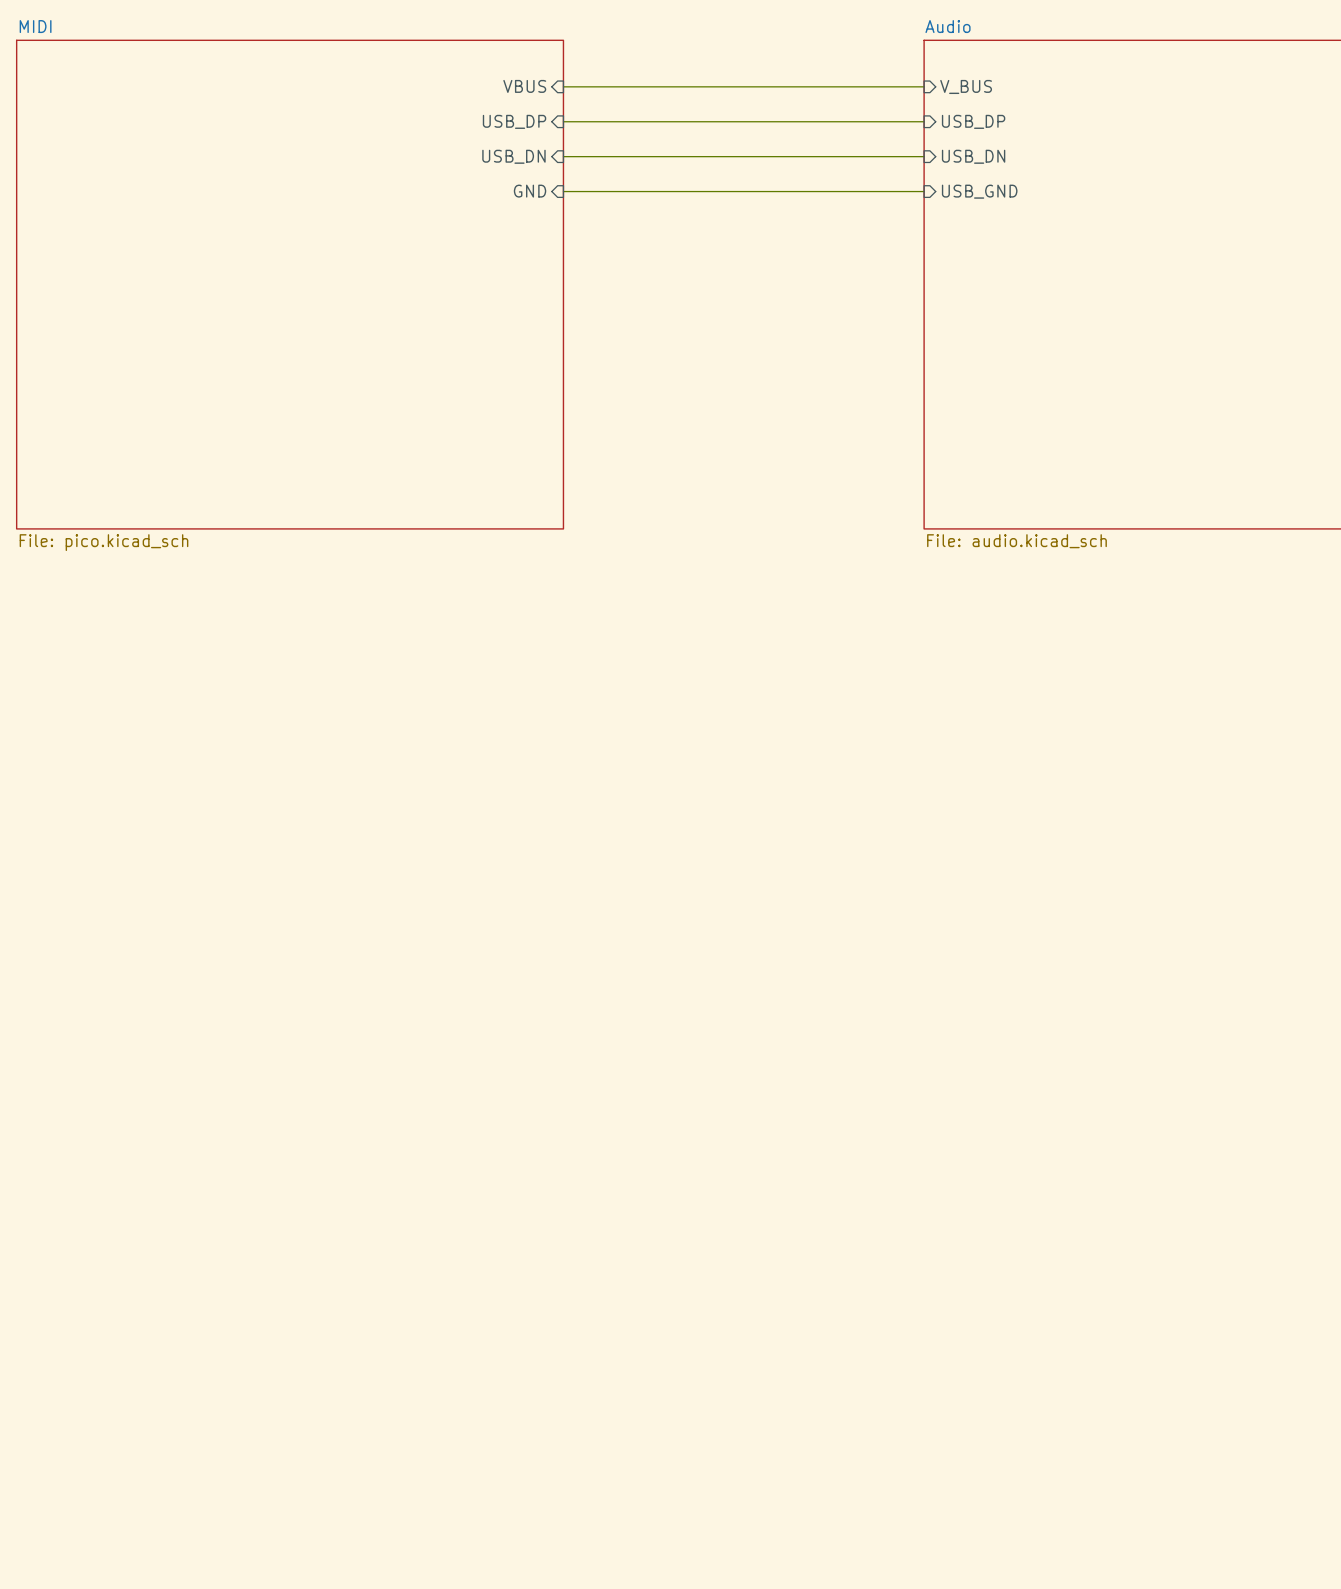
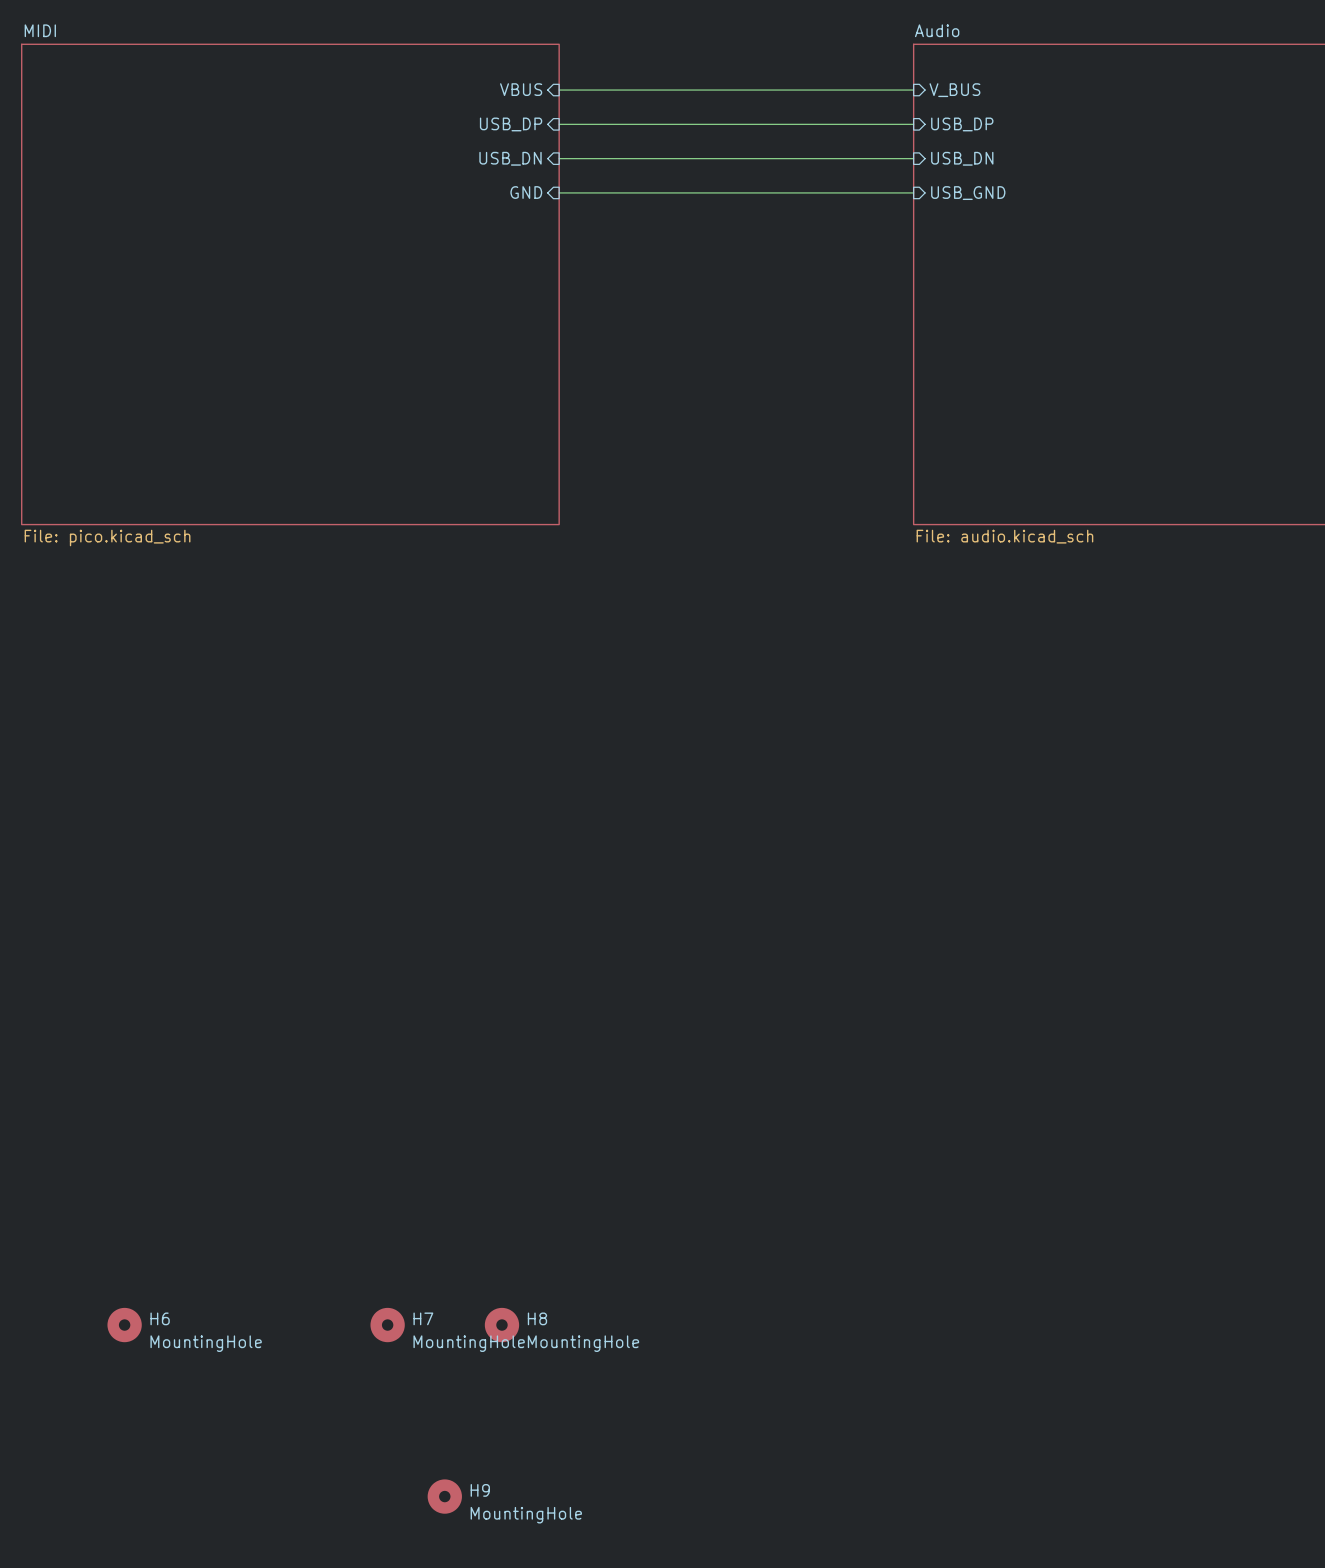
H6: none -> MountingHole (124, 1325)
H7: none -> MountingHole (387, 1325)
H8: none -> MountingHole (501, 1325)
H9: none -> MountingHole (444, 1496)

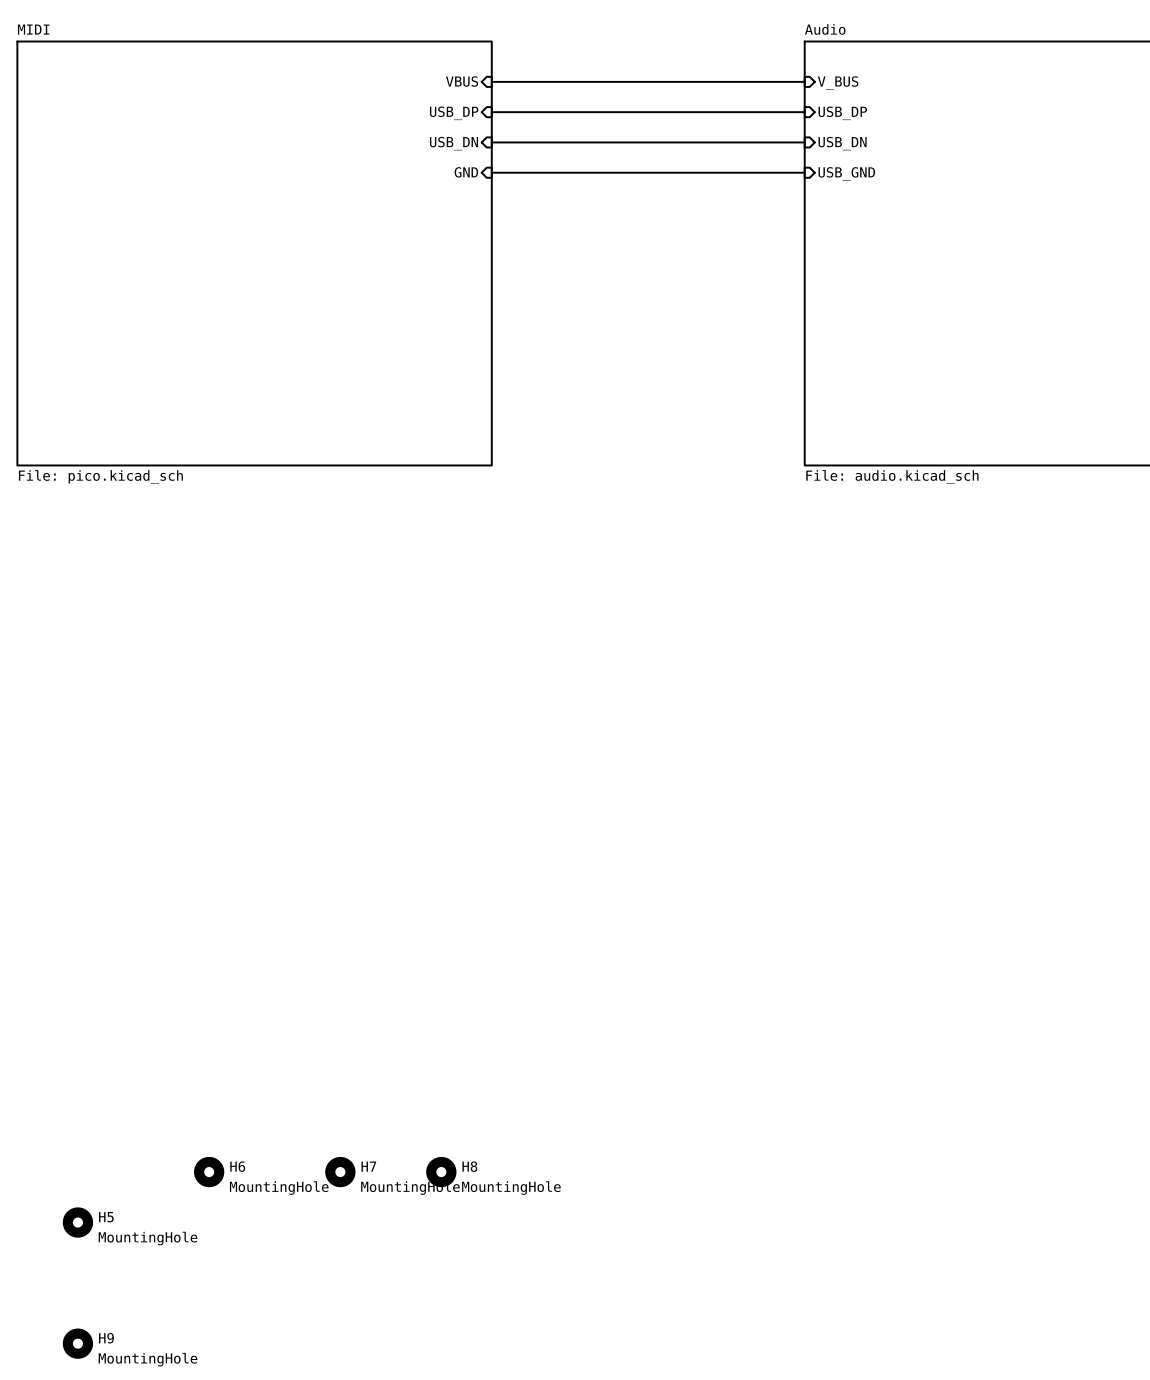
H6 position: (124, 1325) -> (209, 1172)
H5: none -> MountingHole (77, 1222)
H9 position: (444, 1496) -> (77, 1343)

